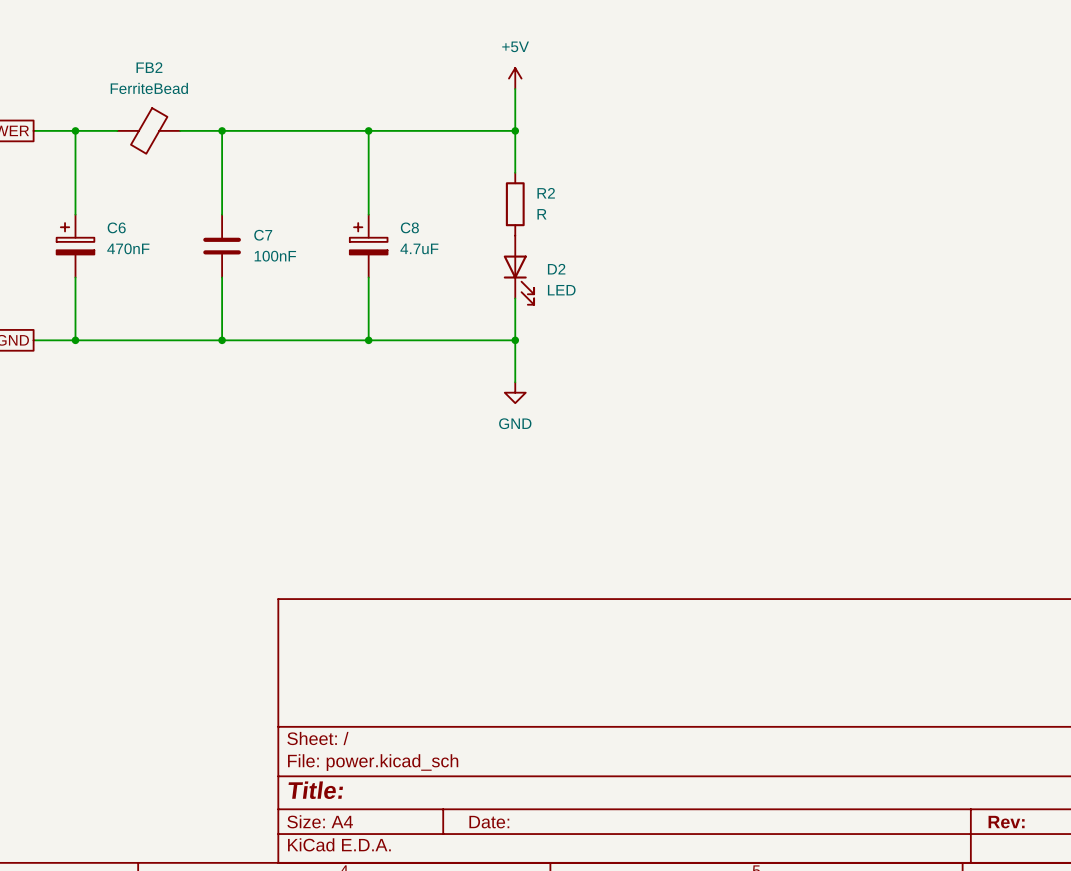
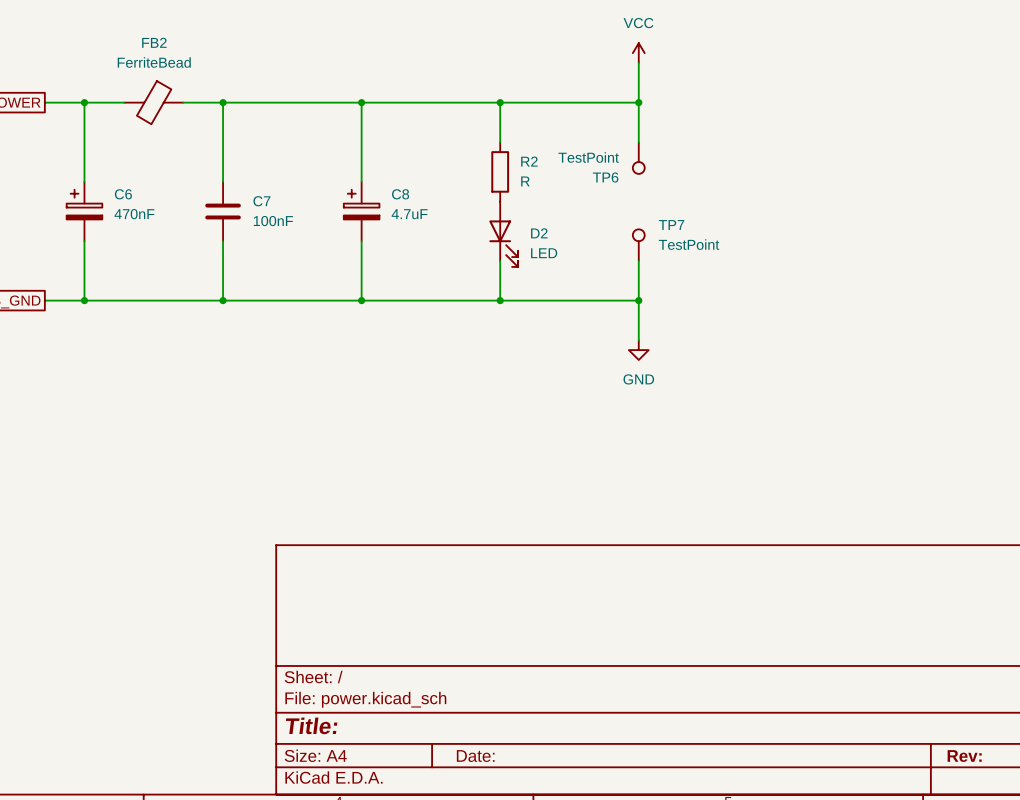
power symbol: +5V (515, 78) -> none
power symbol: none -> VCC (638, 53)
wire: (515, 89) (515, 130) -> (638, 102) (500, 102)
wire: none -> (638, 63) (638, 142)
junction: none -> (638, 102)
TP6: none -> TestPoint (638, 158)
TP7: none -> TestPoint (638, 245)
wire: none -> (638, 261) (638, 340)
wire: (515, 340) (515, 382) -> (500, 300) (638, 300)
junction: none -> (638, 300)
power symbol position: GND (515, 392) -> GND (638, 350)

